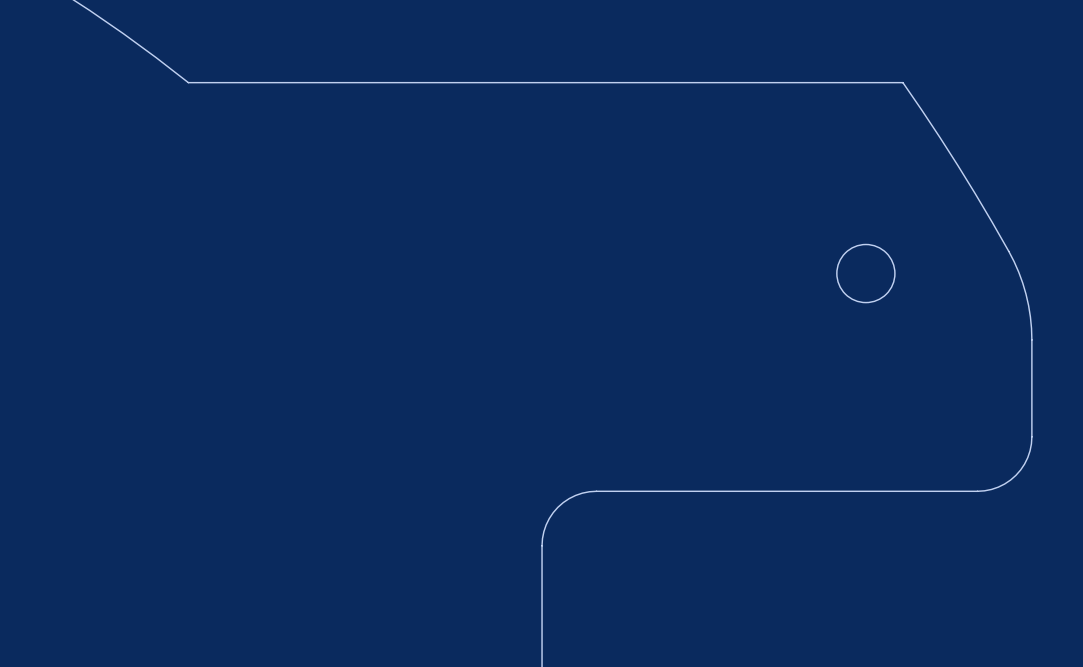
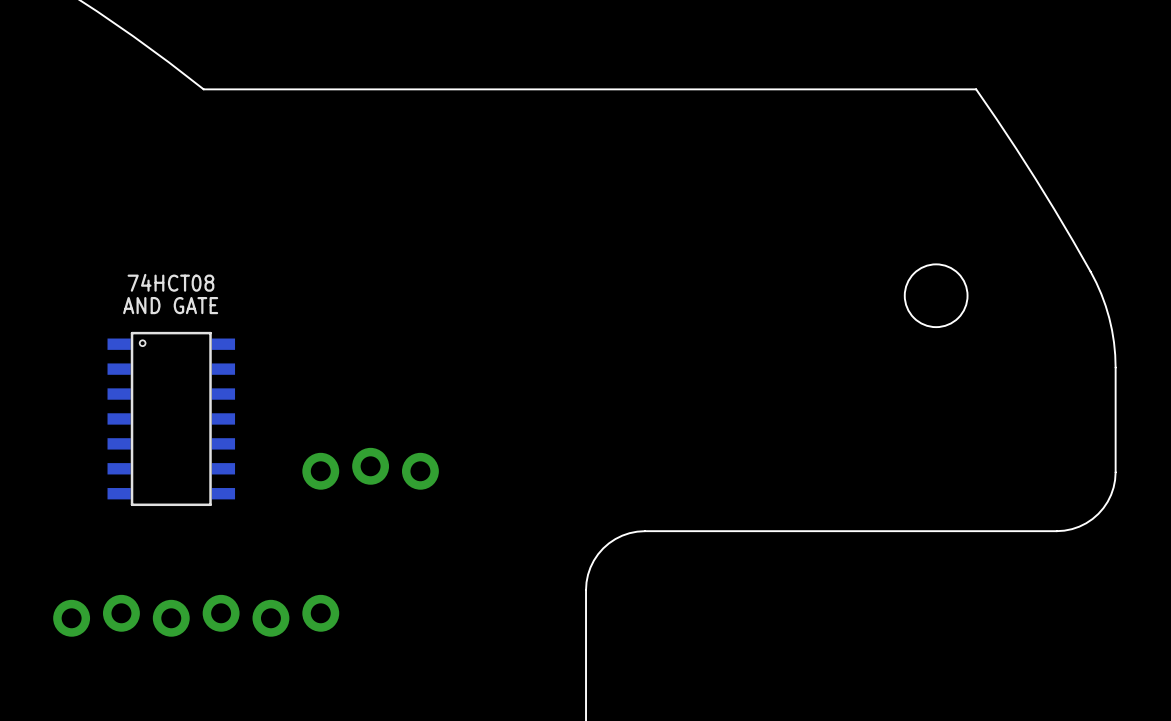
text: none -> 74HCT08 (170, 282)
text: none -> AND GATE (170, 305)
part: none -> (171, 418)
part: none -> (370, 468)
part: none -> (196, 615)

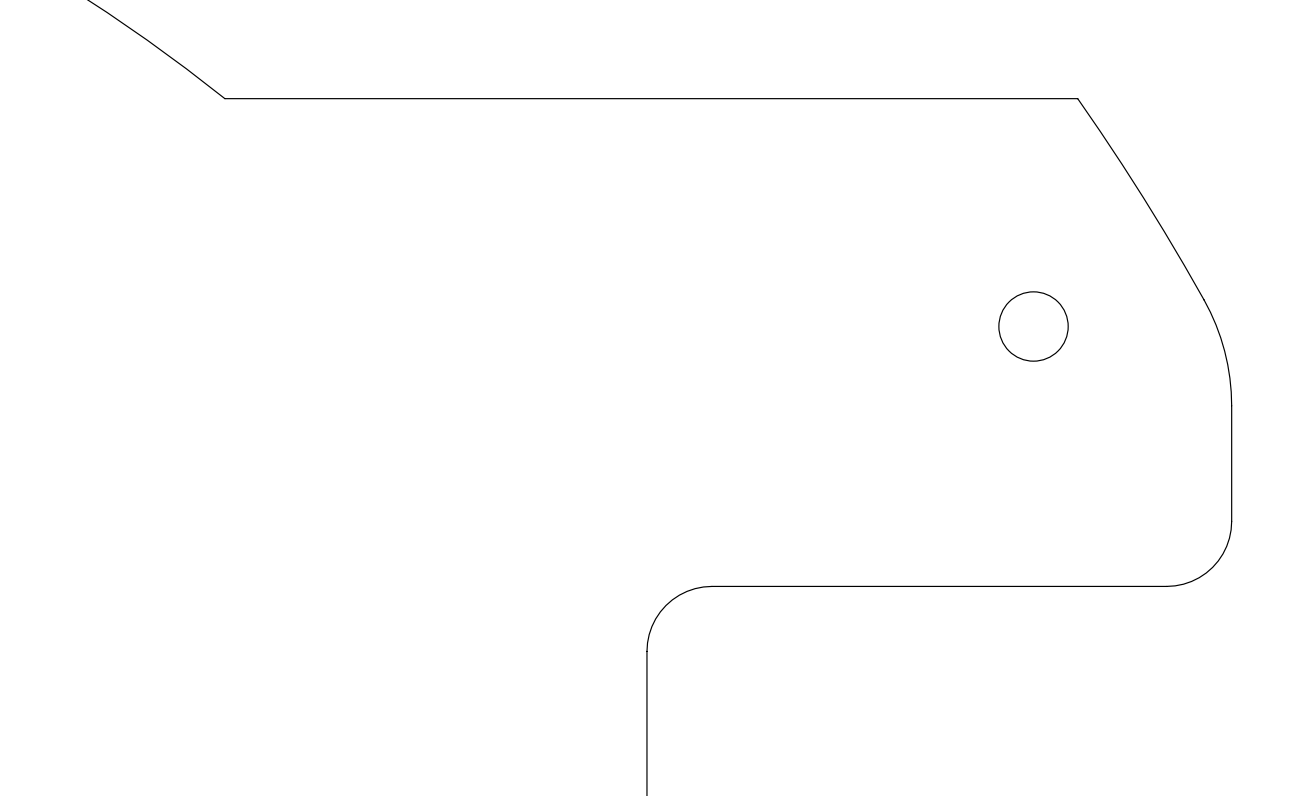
text: 74HCT08 (170, 282) -> none
text: AND GATE (170, 305) -> none
part: (171, 418) -> none
part: (370, 468) -> none
part: (196, 615) -> none

